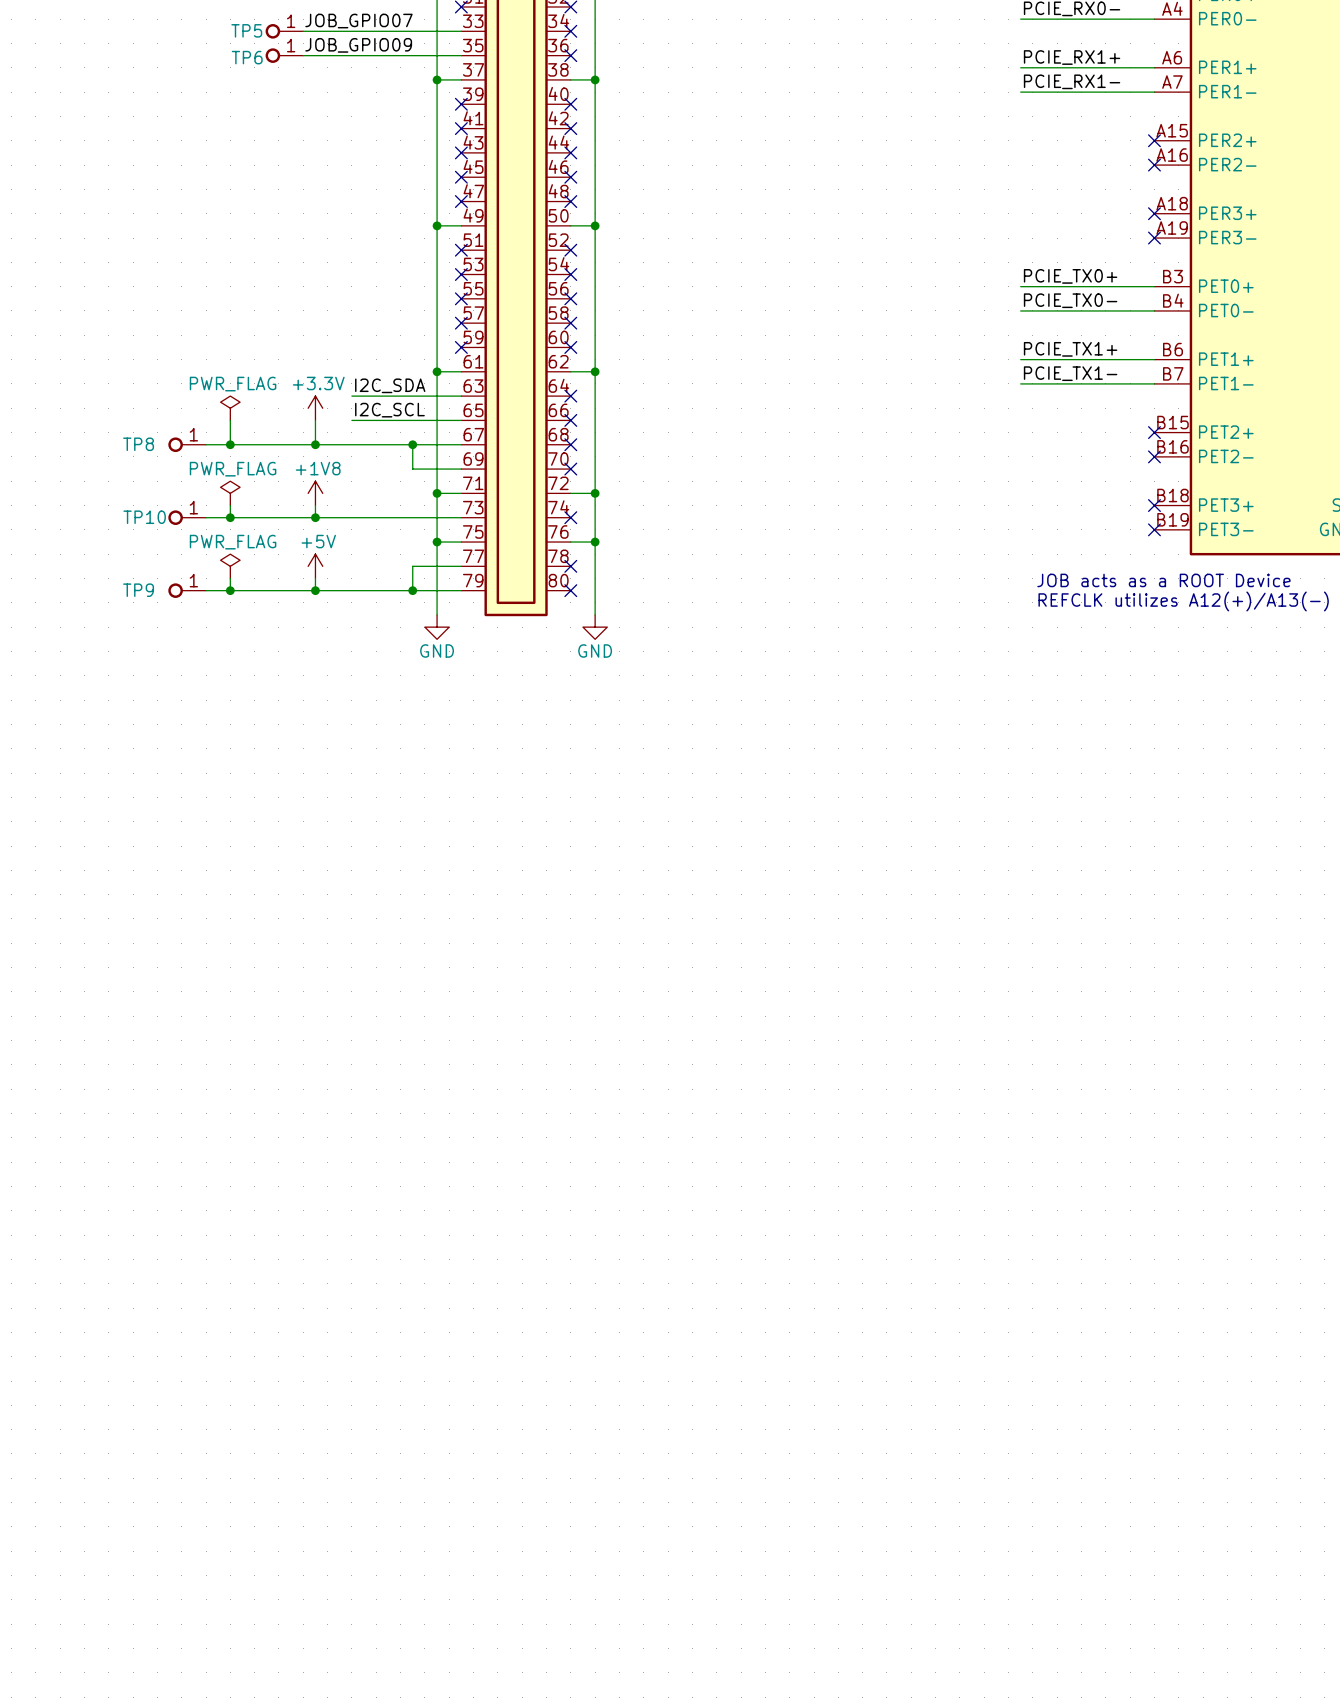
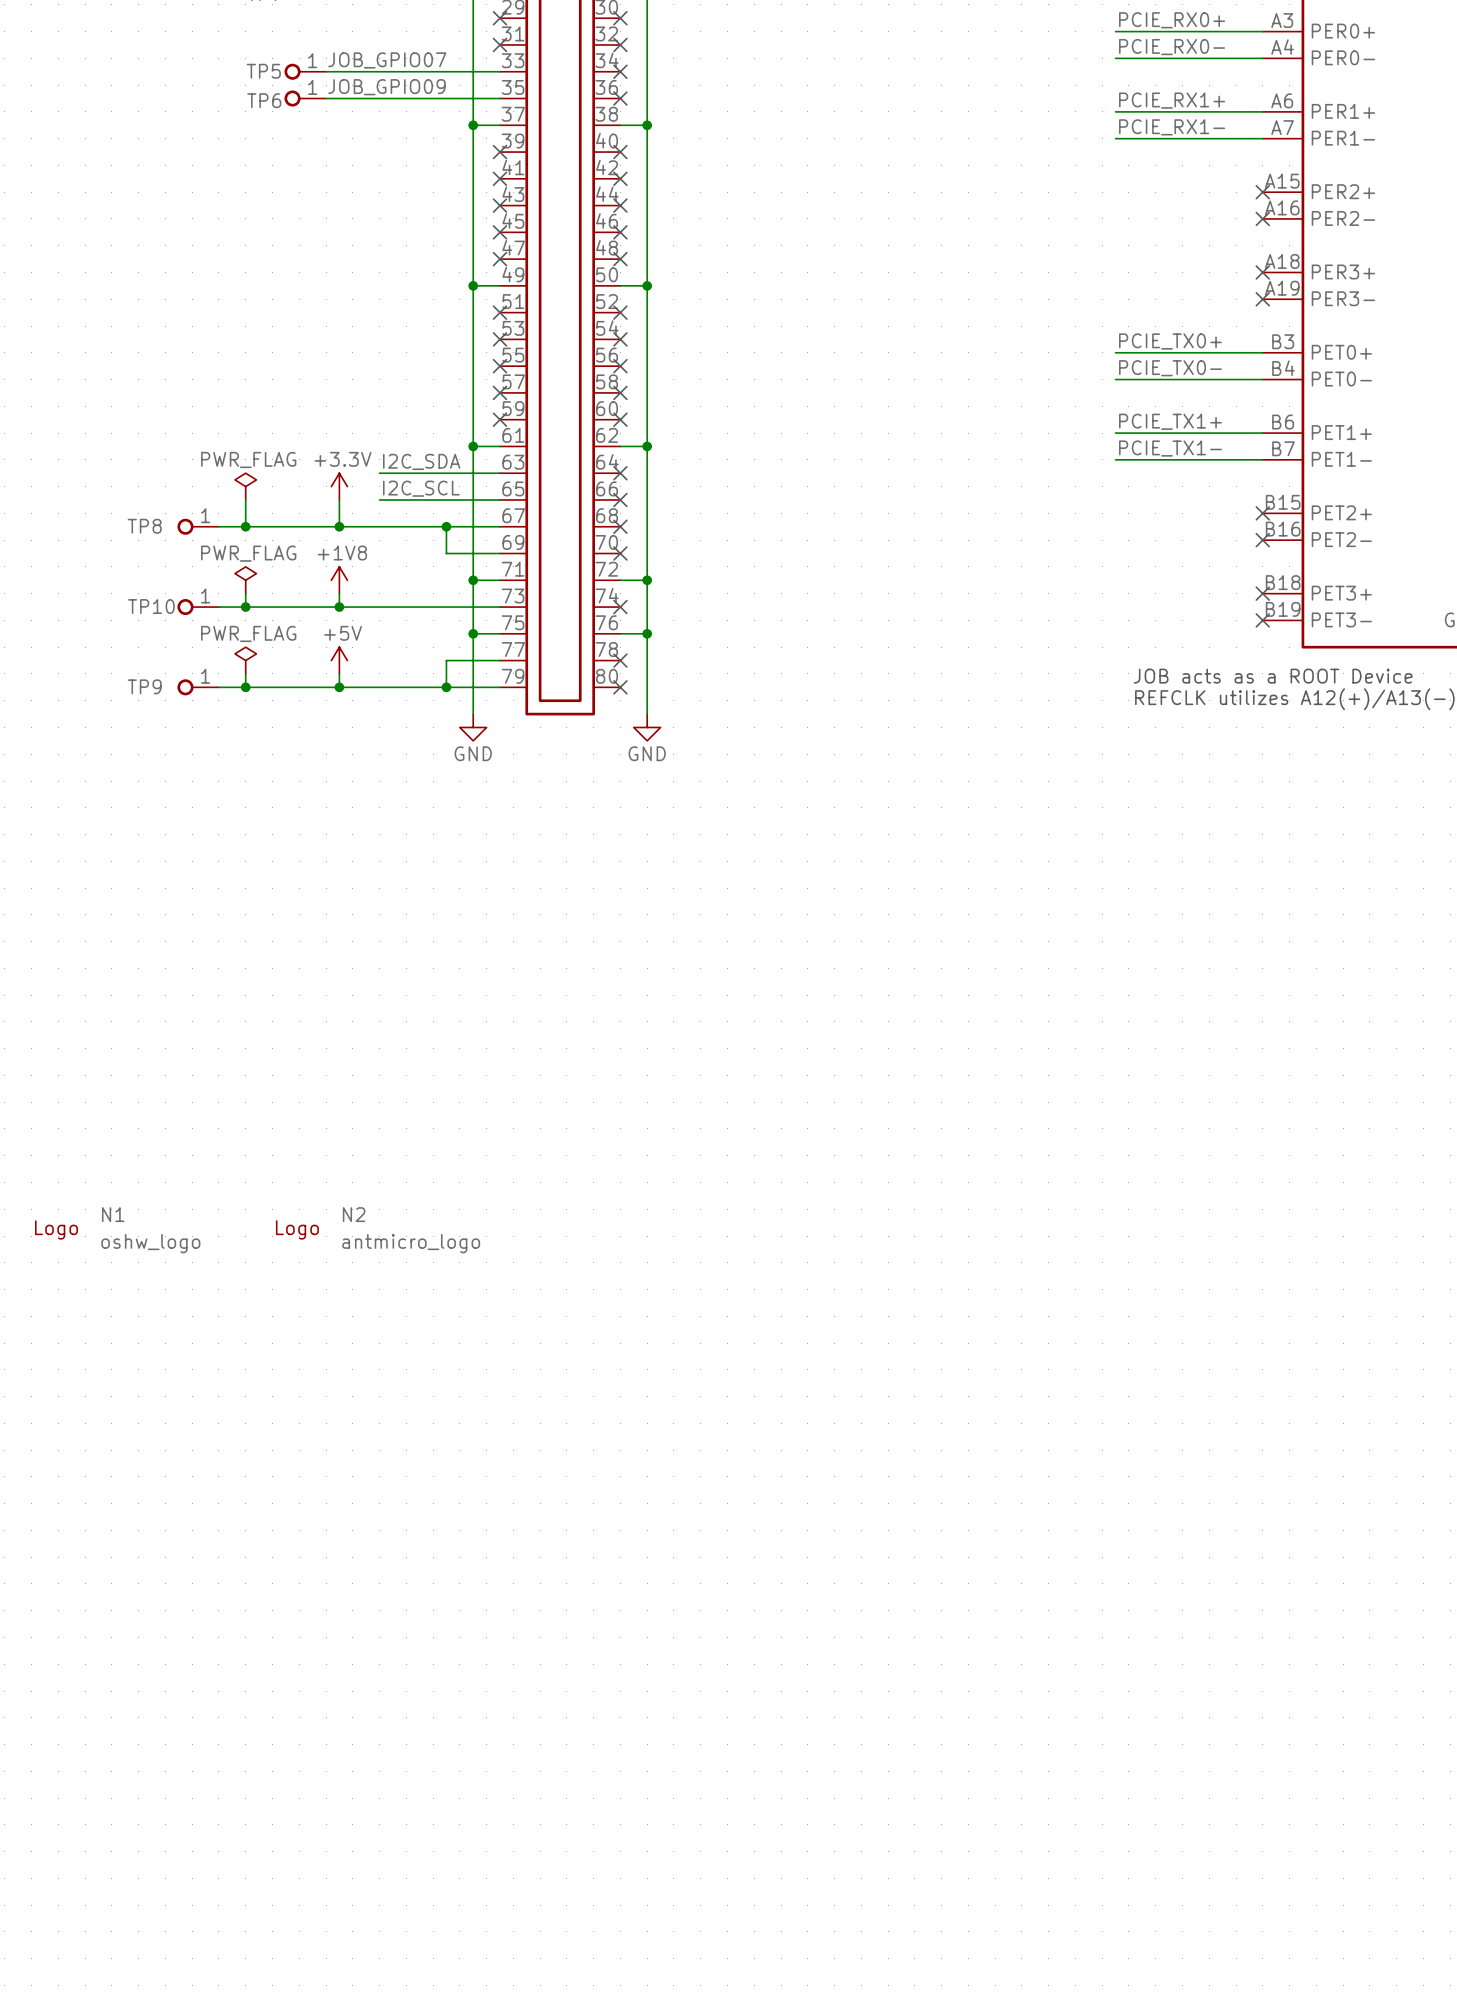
N1: none -> oshw_logo (117, 1230)
N2: none -> antmicro_logo (378, 1230)

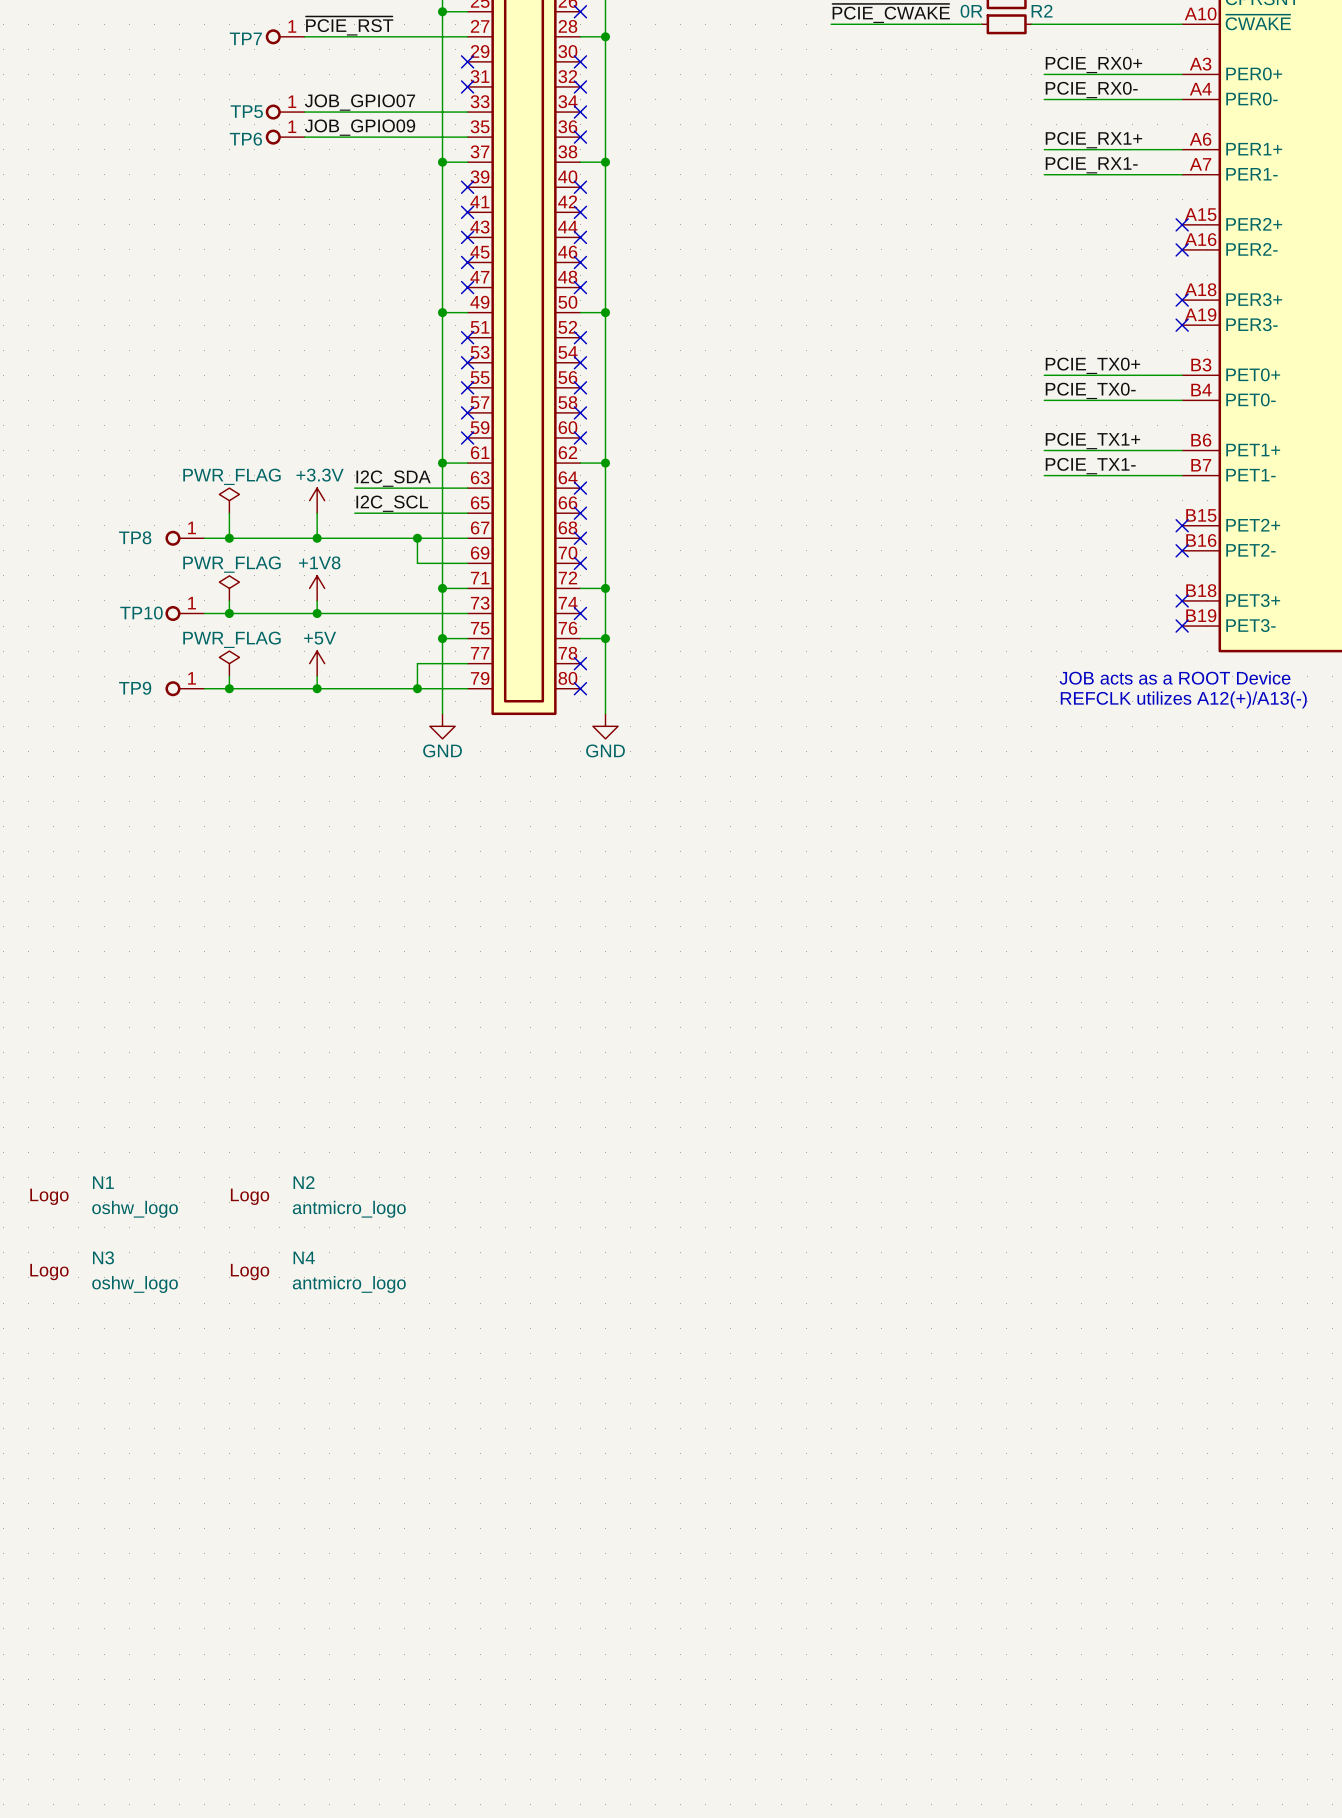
N2 position: (378, 1230) -> (318, 1196)
N3: none -> oshw_logo (104, 1272)
N4: none -> antmicro_logo (318, 1272)

